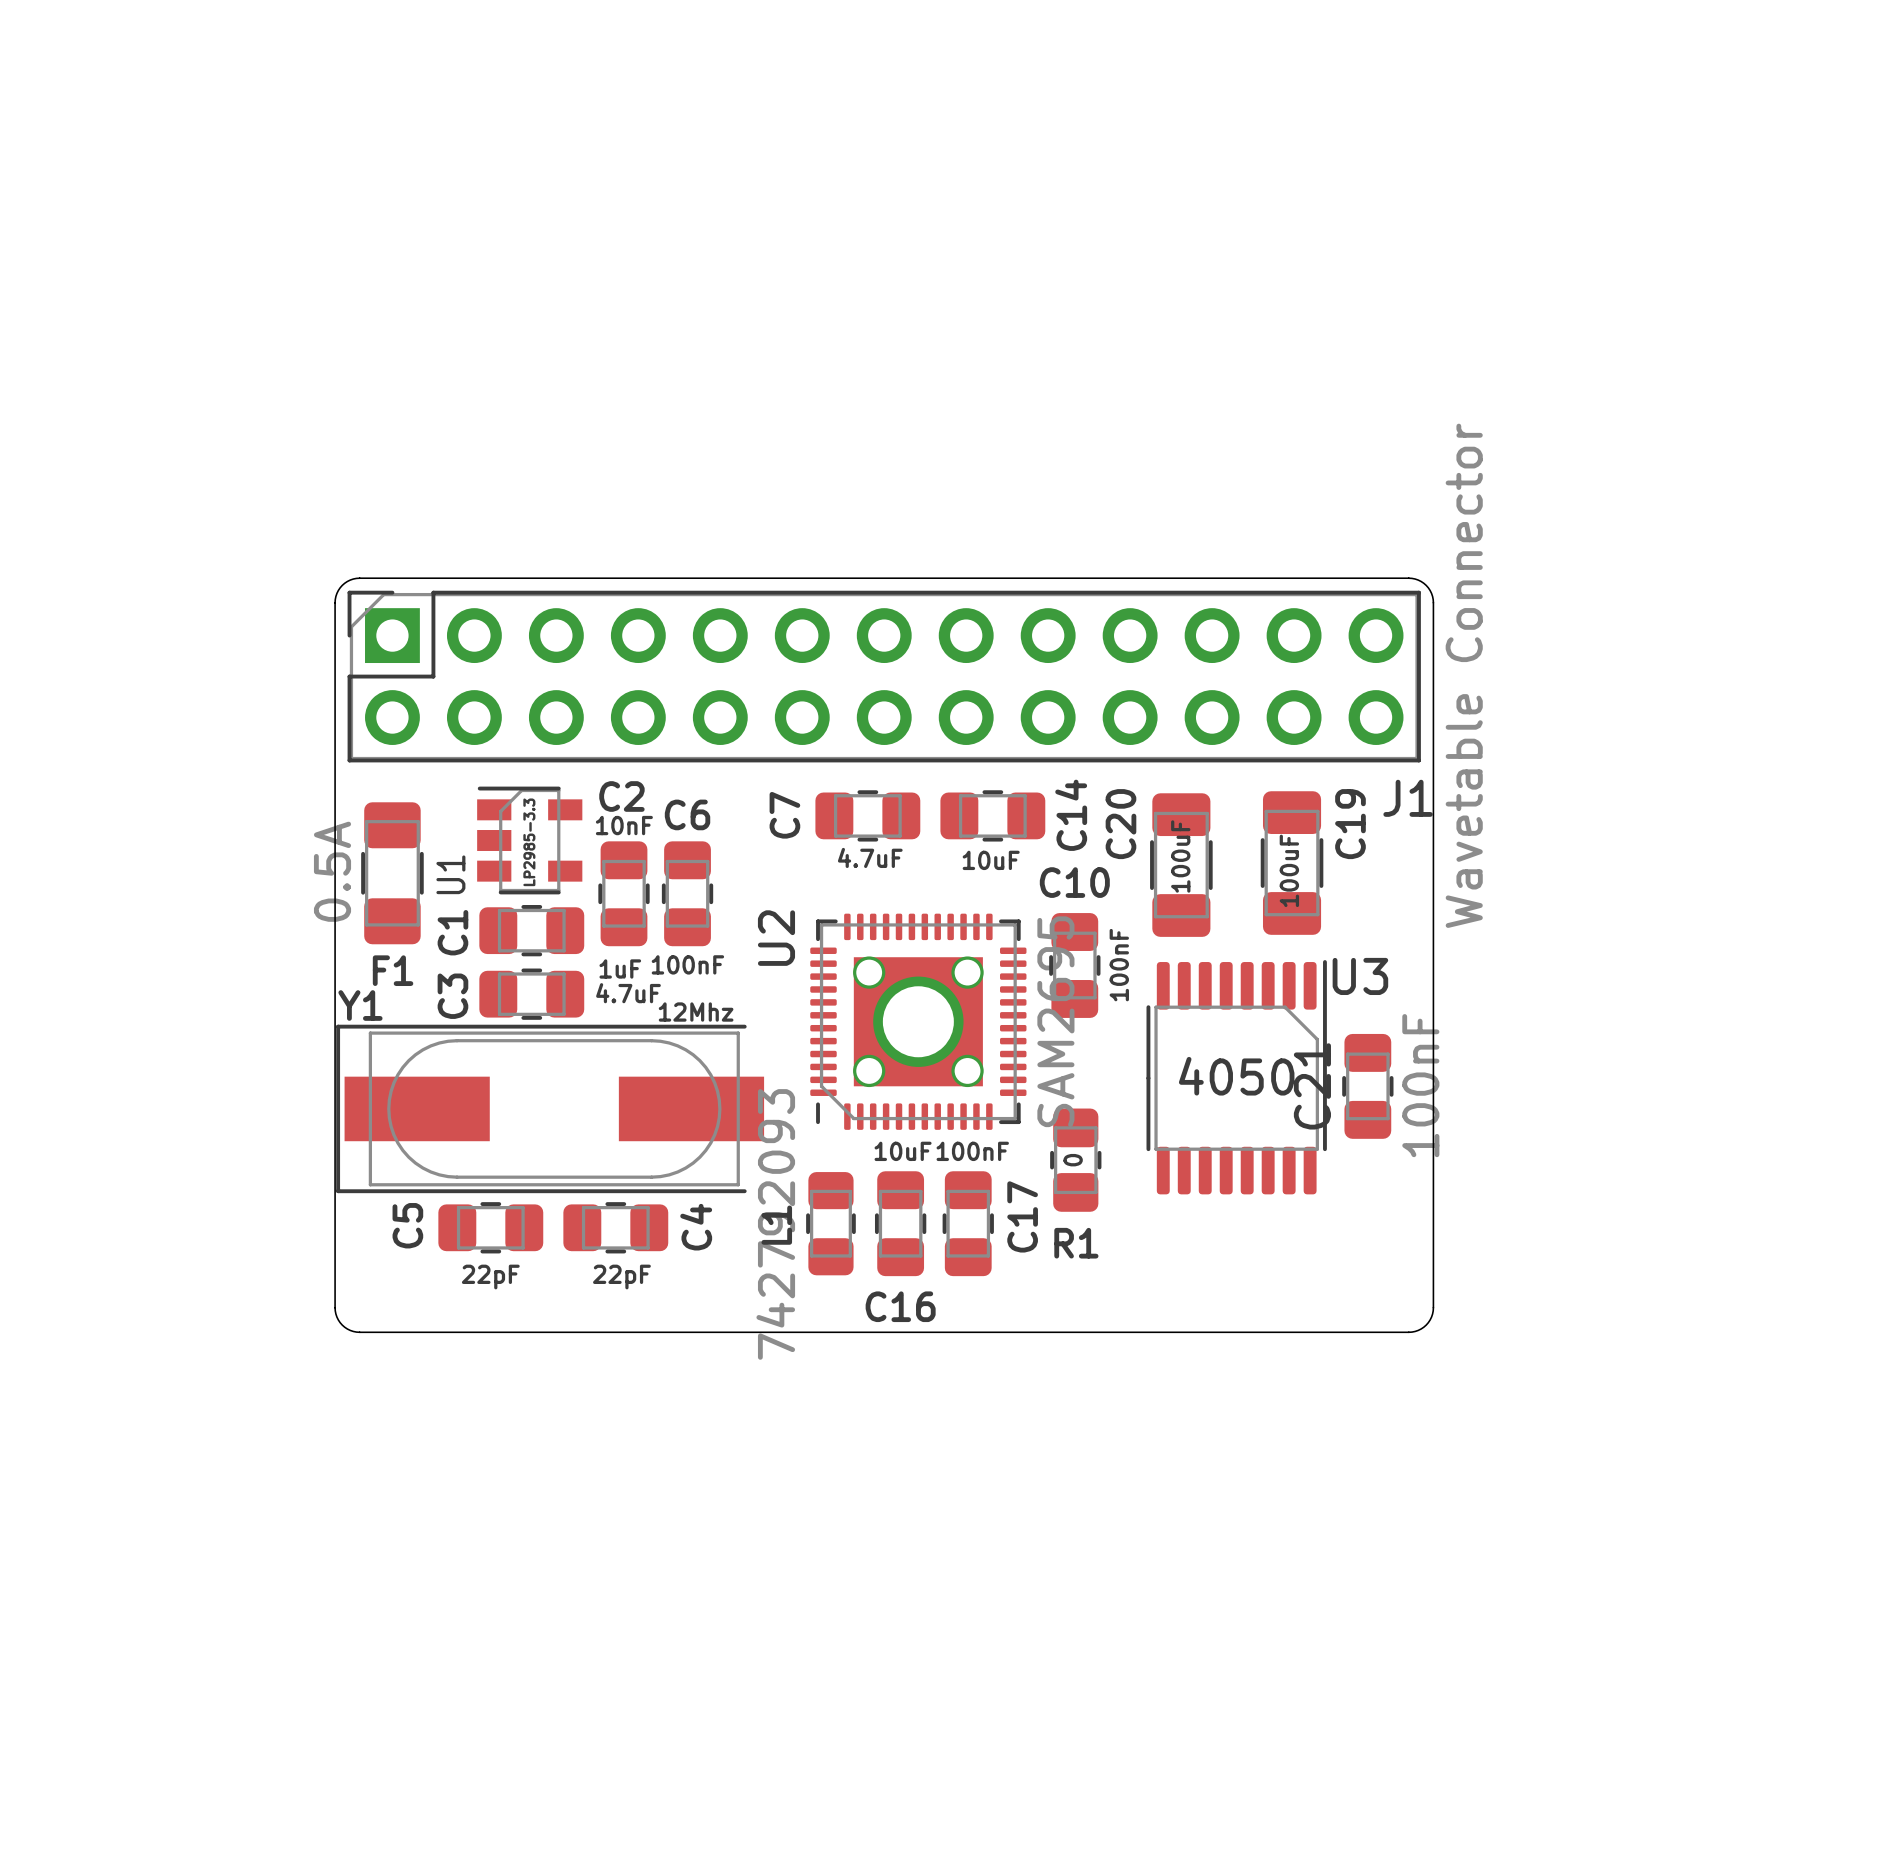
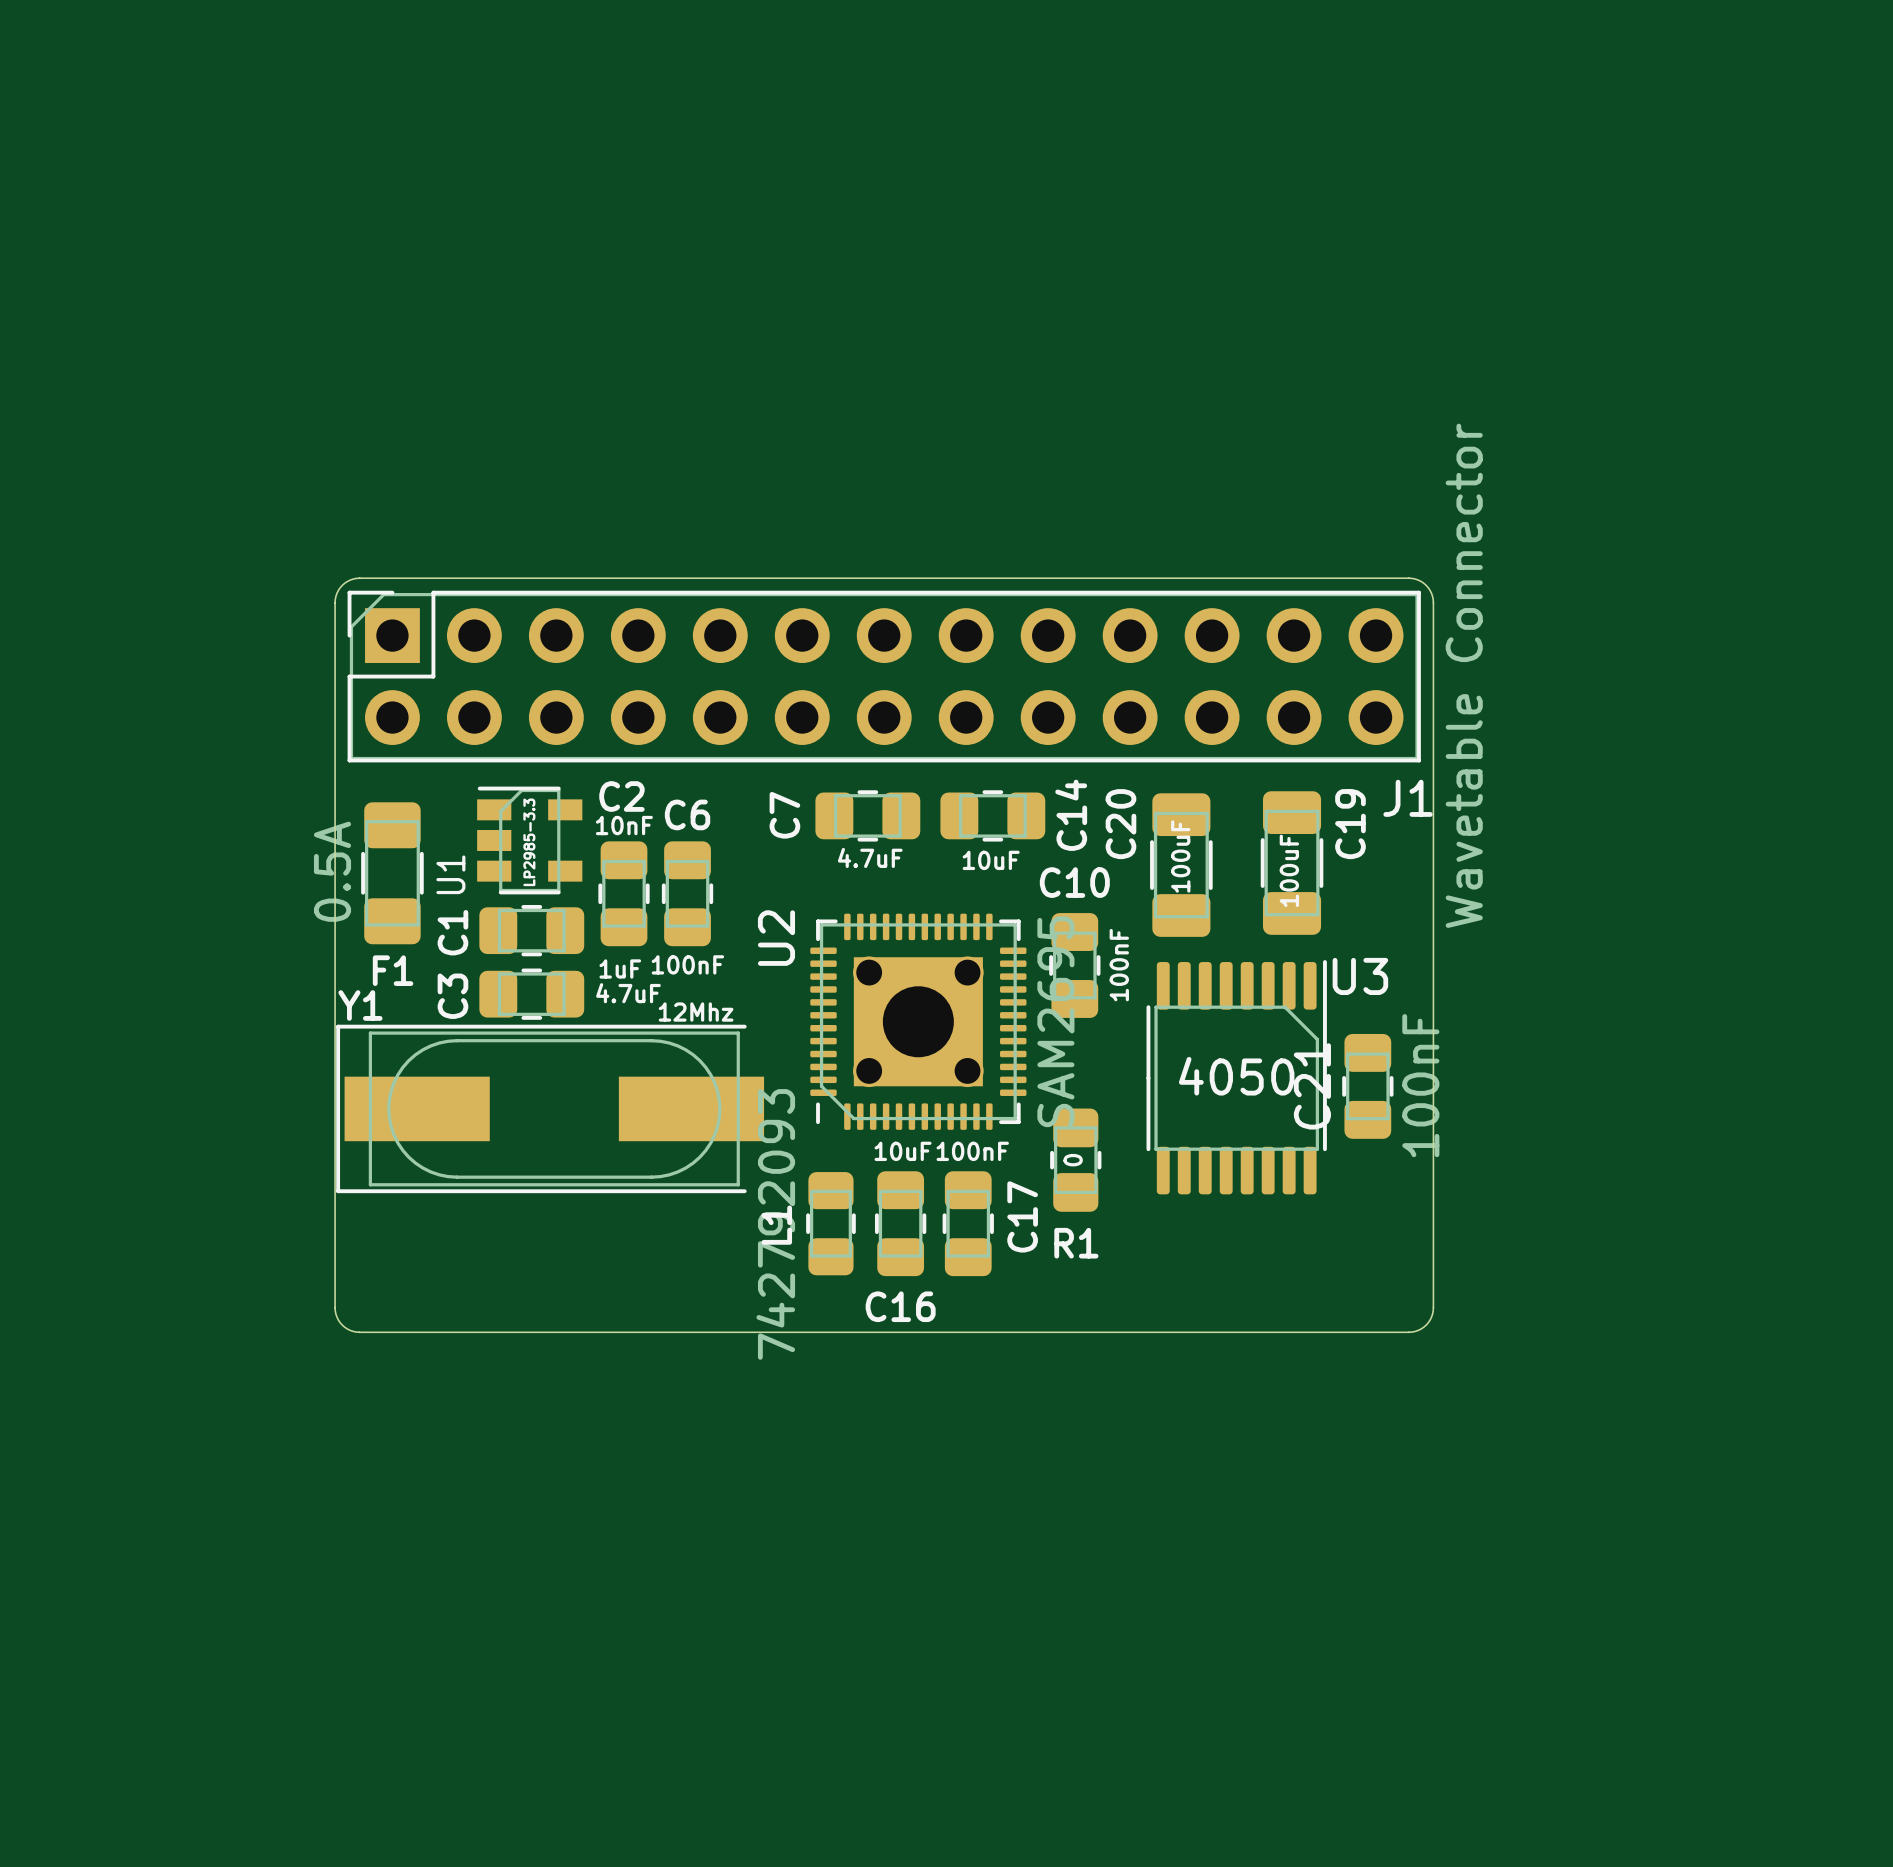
C5: 22pF (490, 1227) -> none
C4: 22pF (615, 1227) -> none

